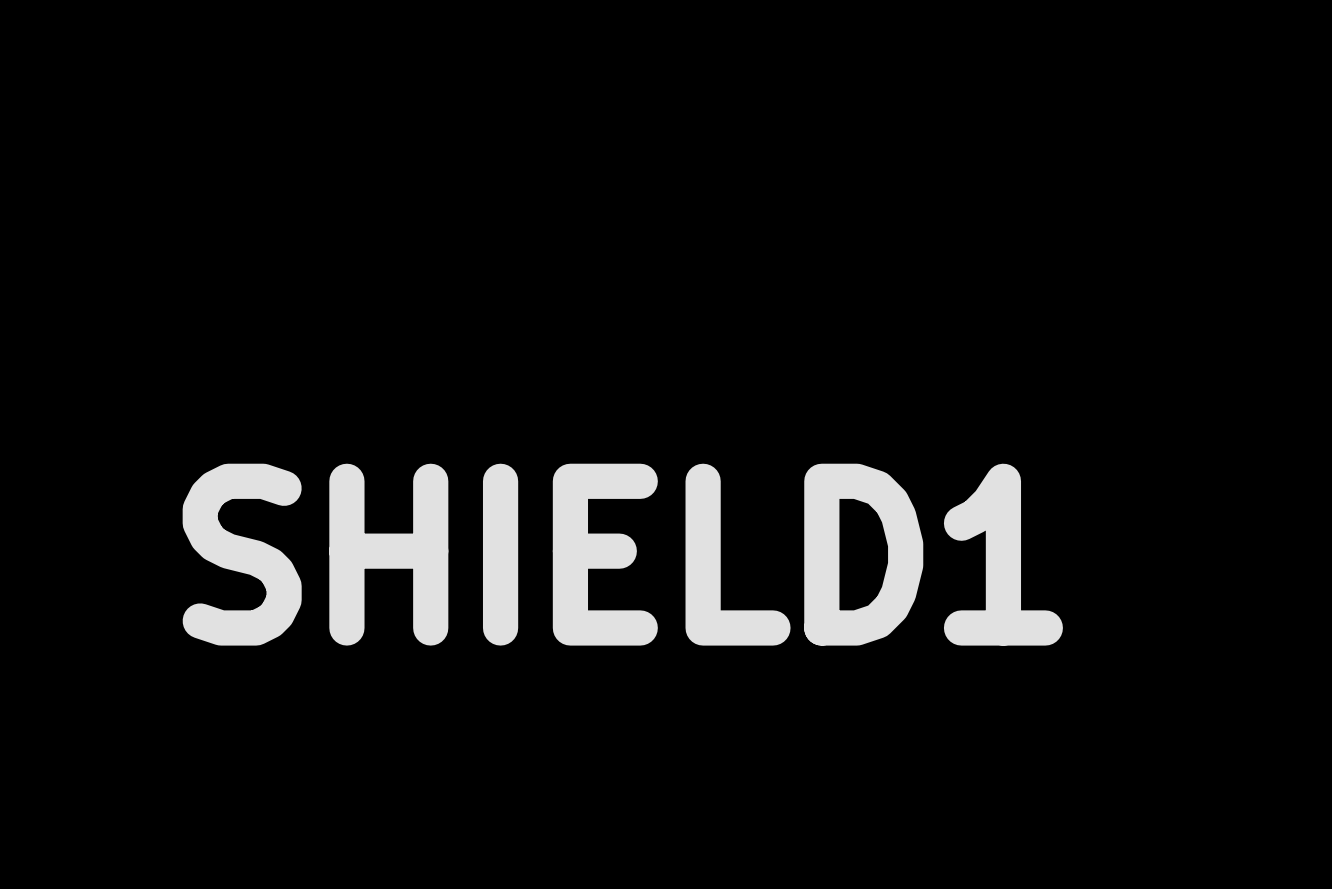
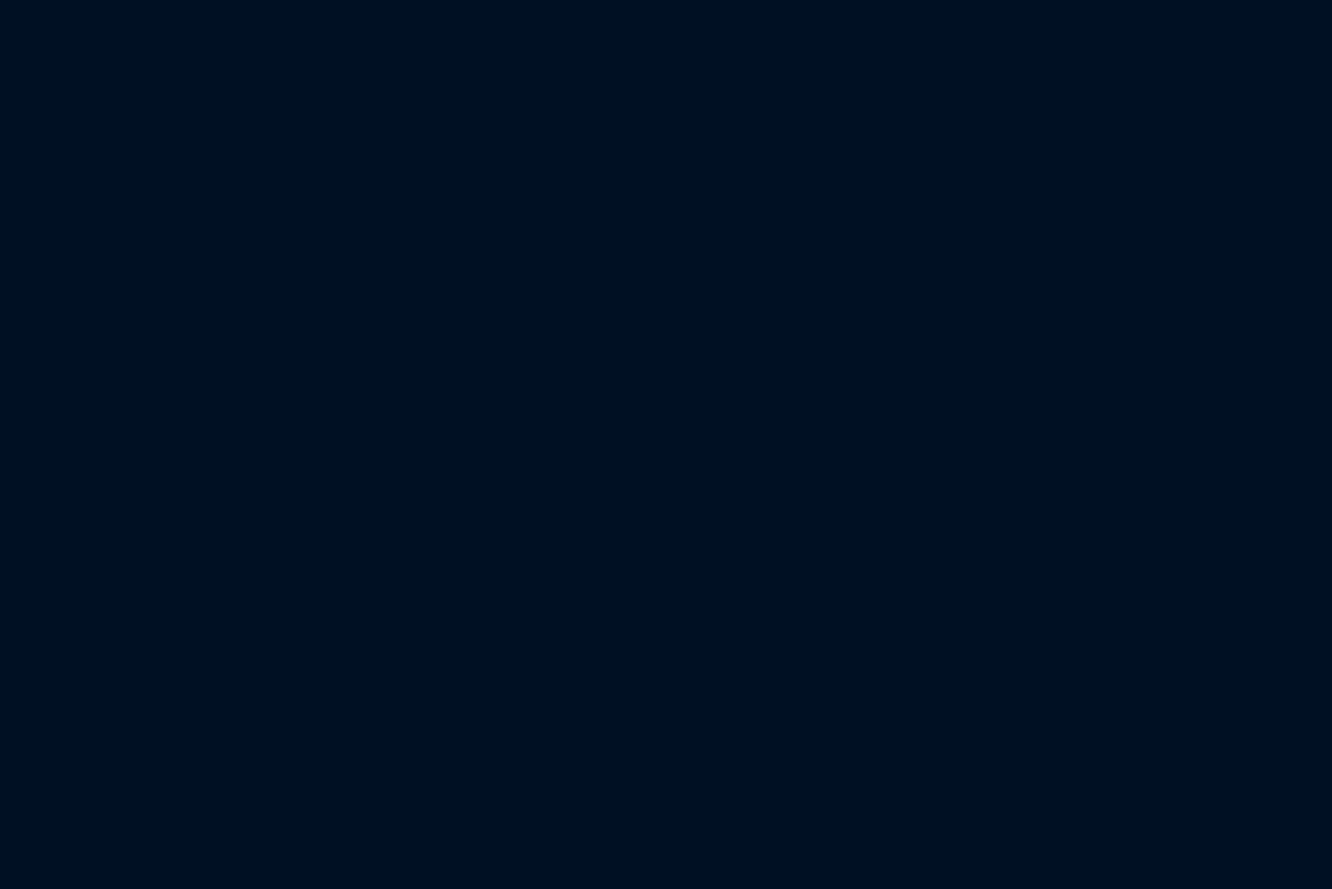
SHIELD1 name: SHIELD1 (622, 554) -> none

